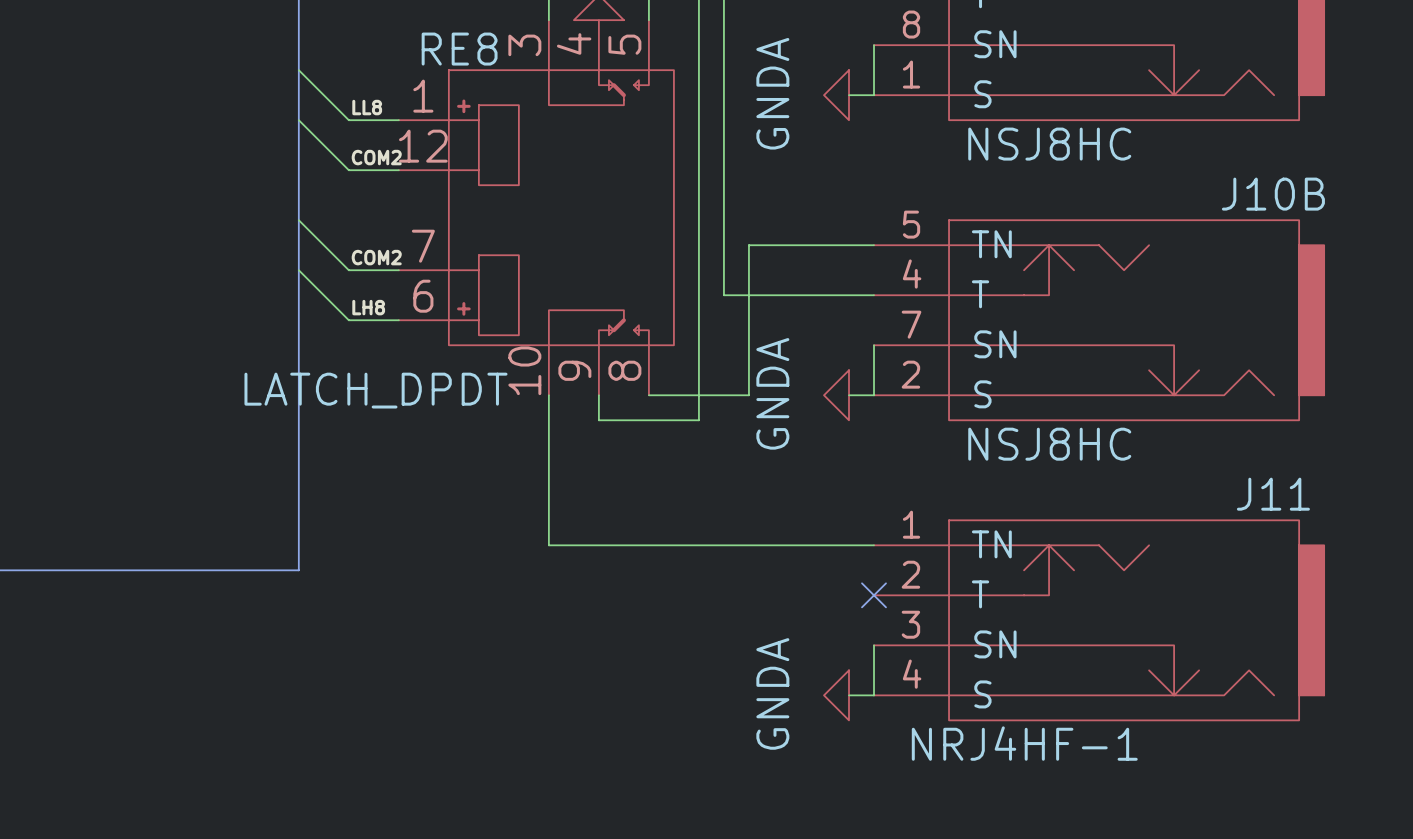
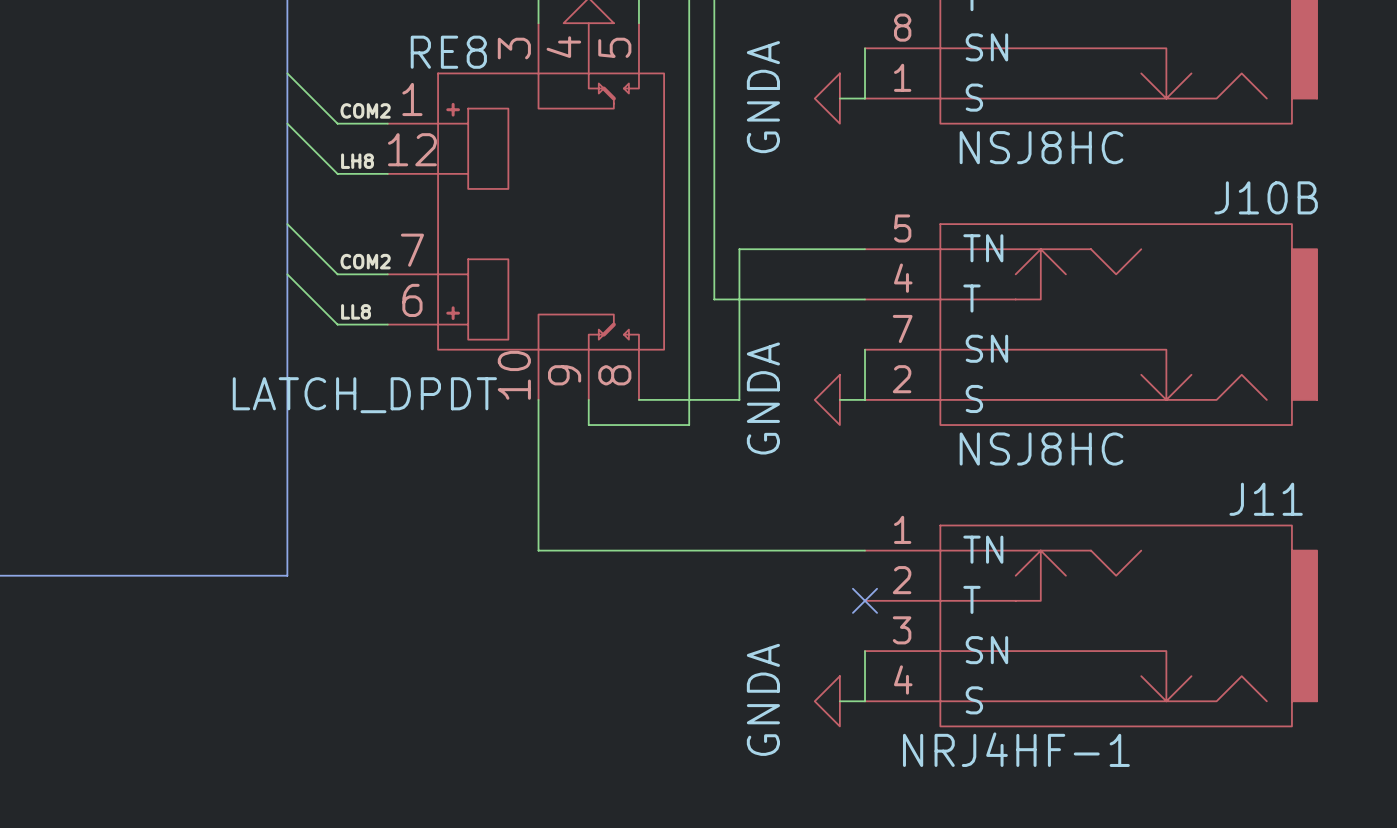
label: LL8 (367, 107) -> COM2 (365, 110)
label: COM2 (376, 157) -> LH8 (357, 161)
label: LH8 (368, 307) -> LL8 (356, 311)

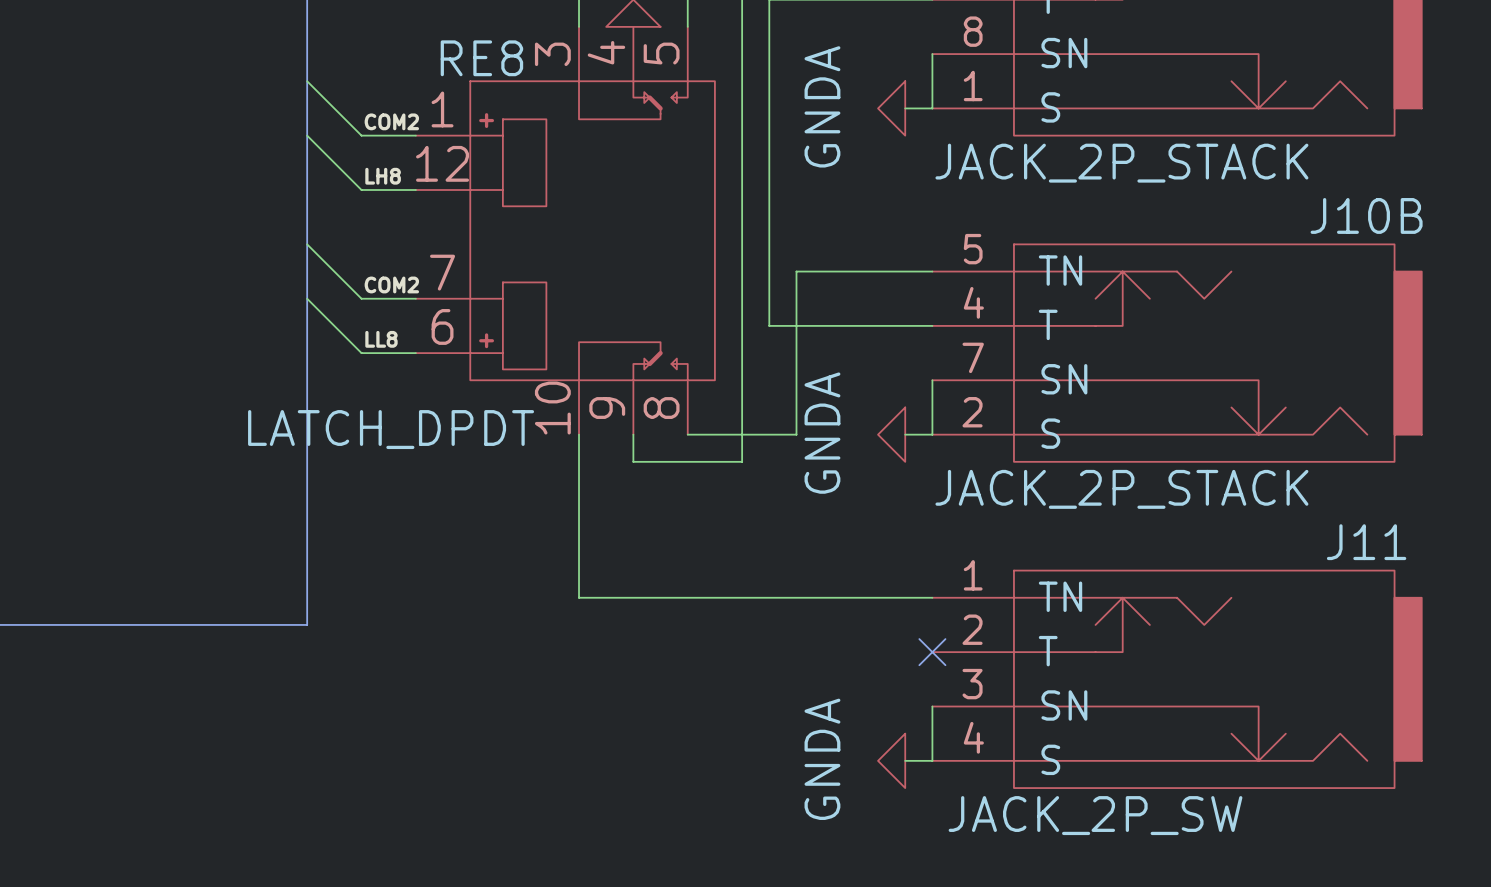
part value: NSJ8HC (1041, 147) -> JACK_2P_STACK (1121, 163)
J10B value: NSJ8HC (1041, 449) -> JACK_2P_STACK (1121, 489)
J11 value: NRJ4HF-1 (1016, 749) -> JACK_2P_SW (1095, 815)

